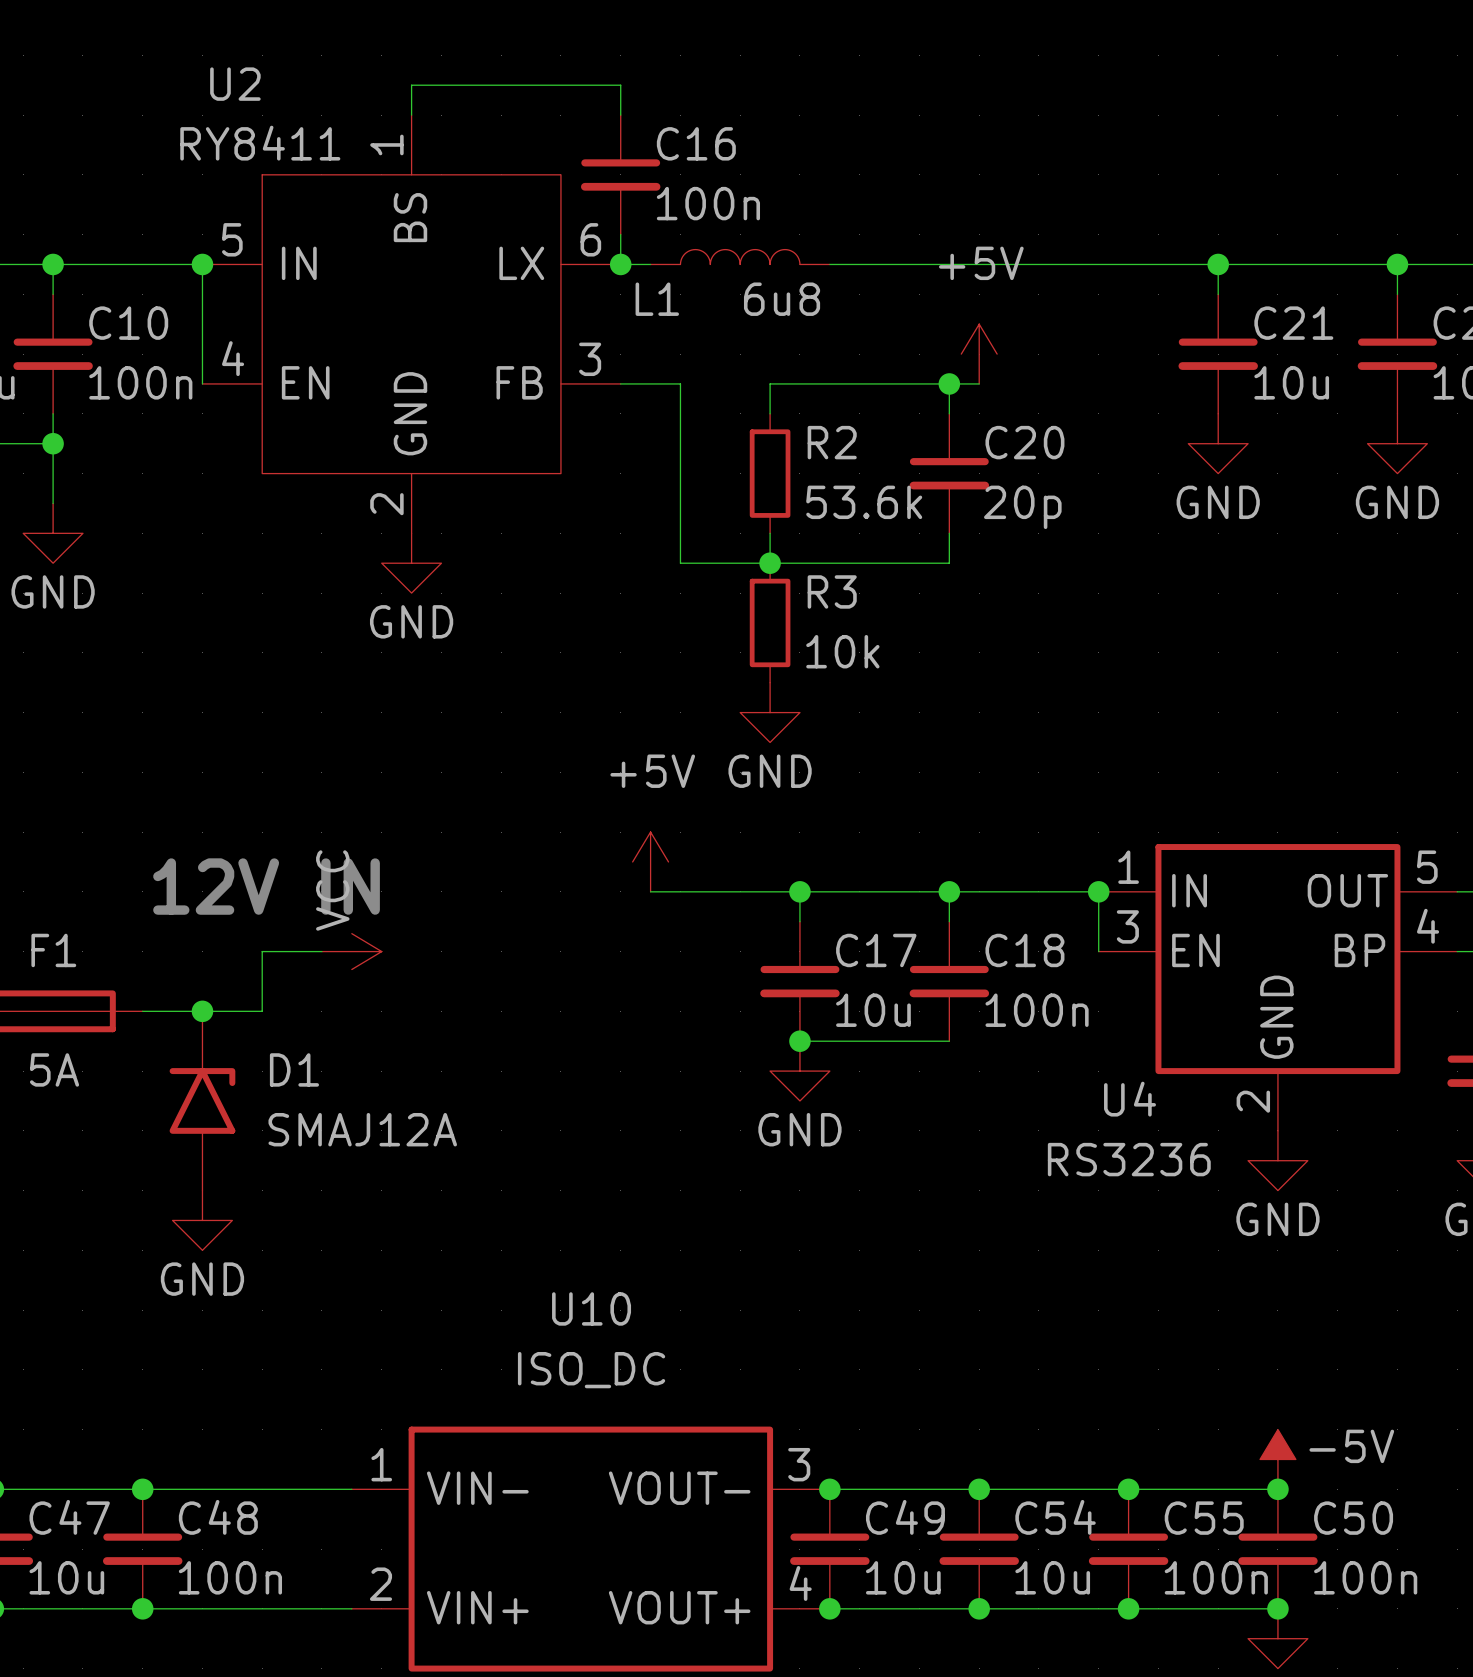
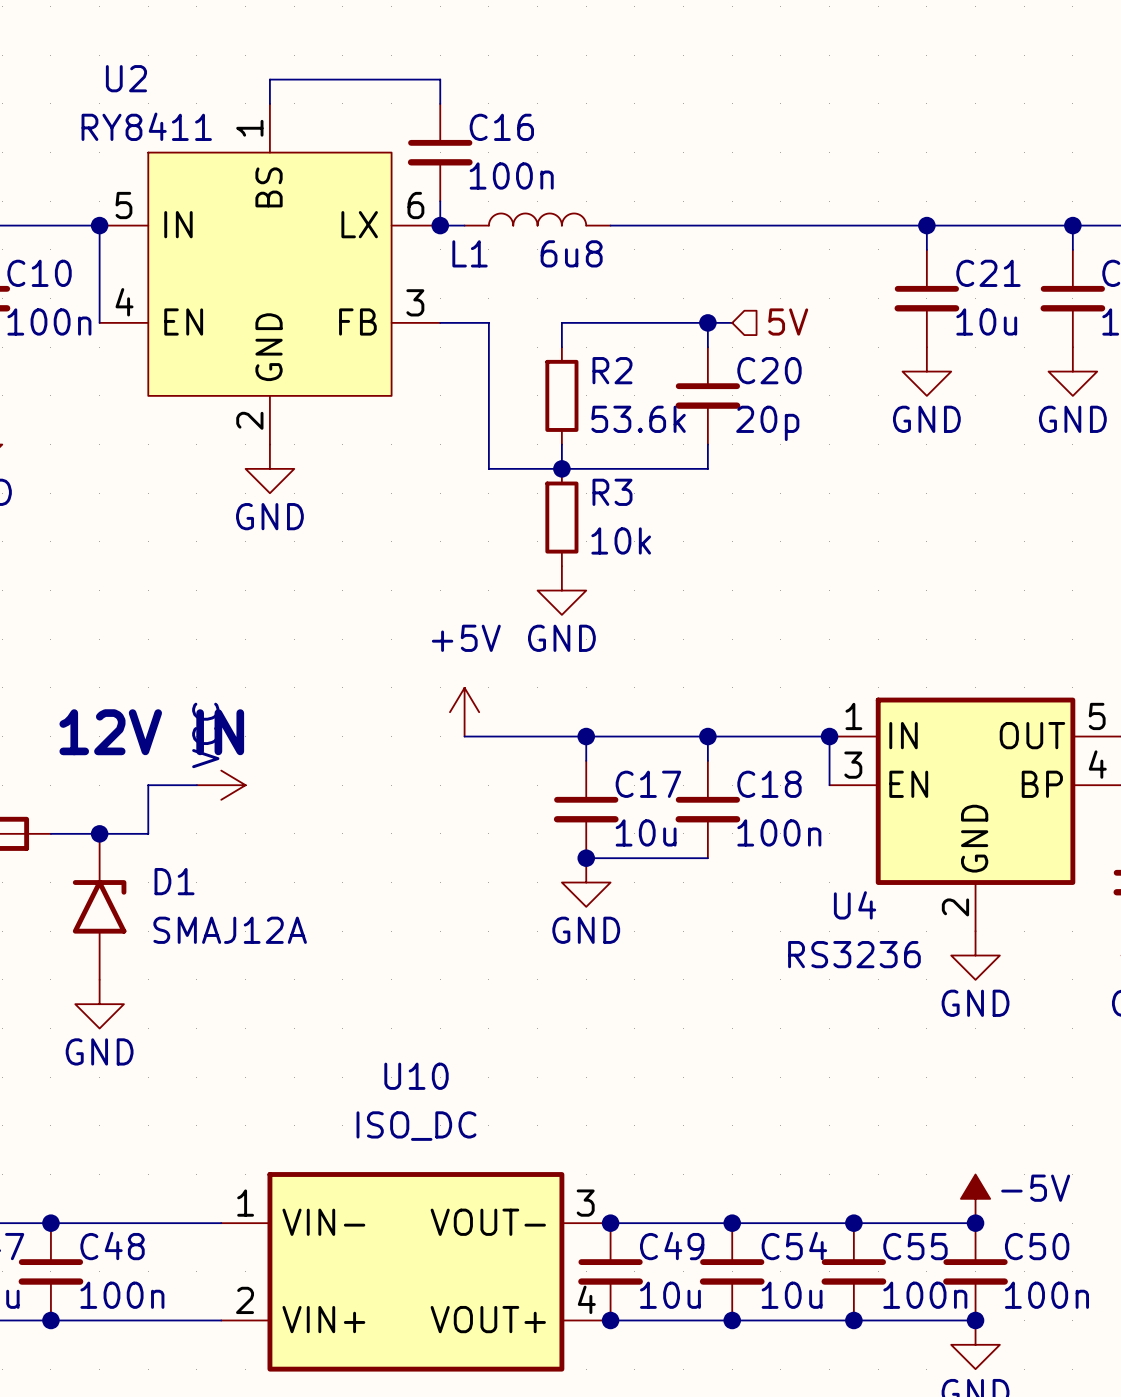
power symbol: +5V (979, 354) -> none
hierarchical label: none -> 5V (788, 321)

